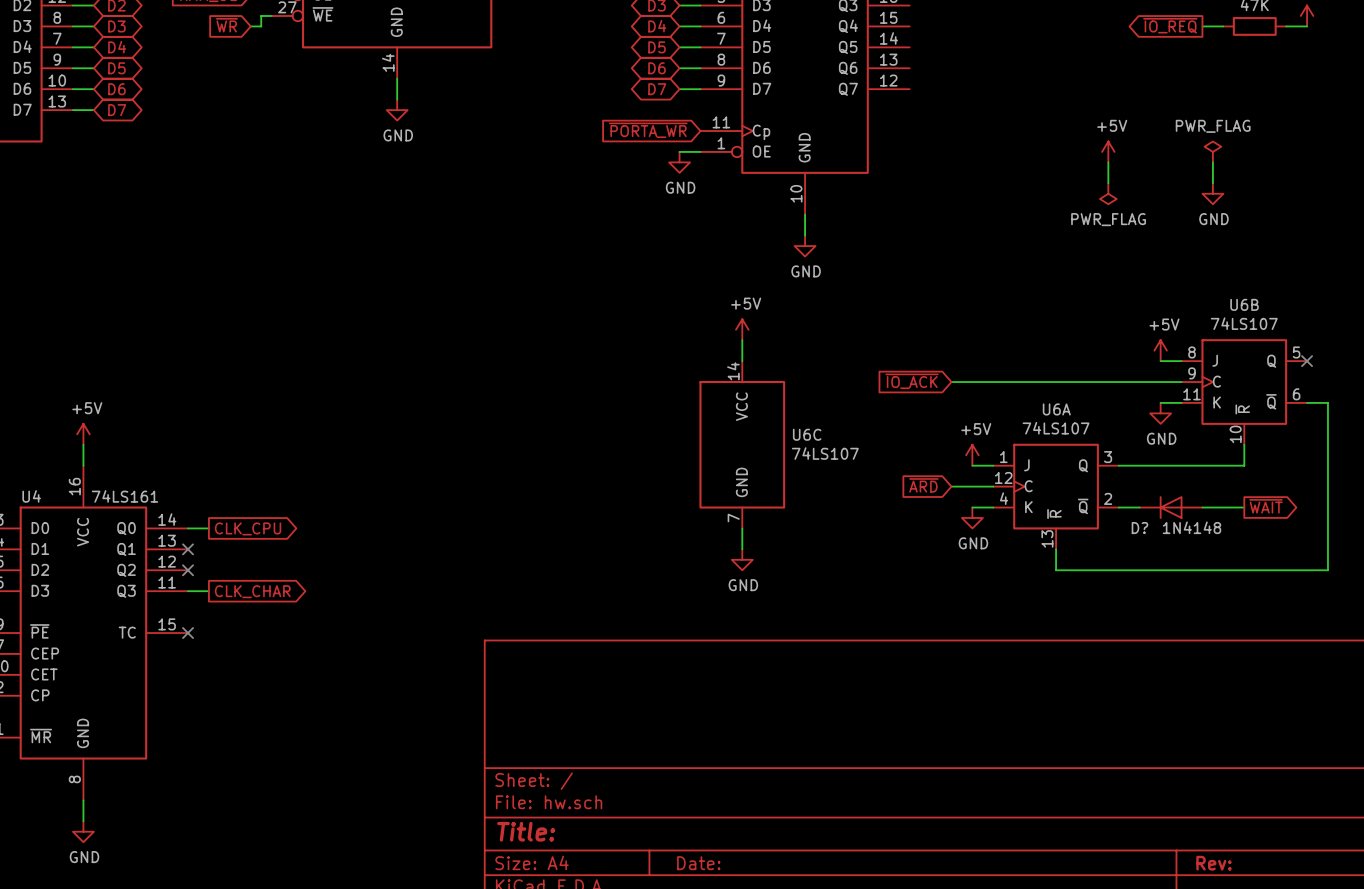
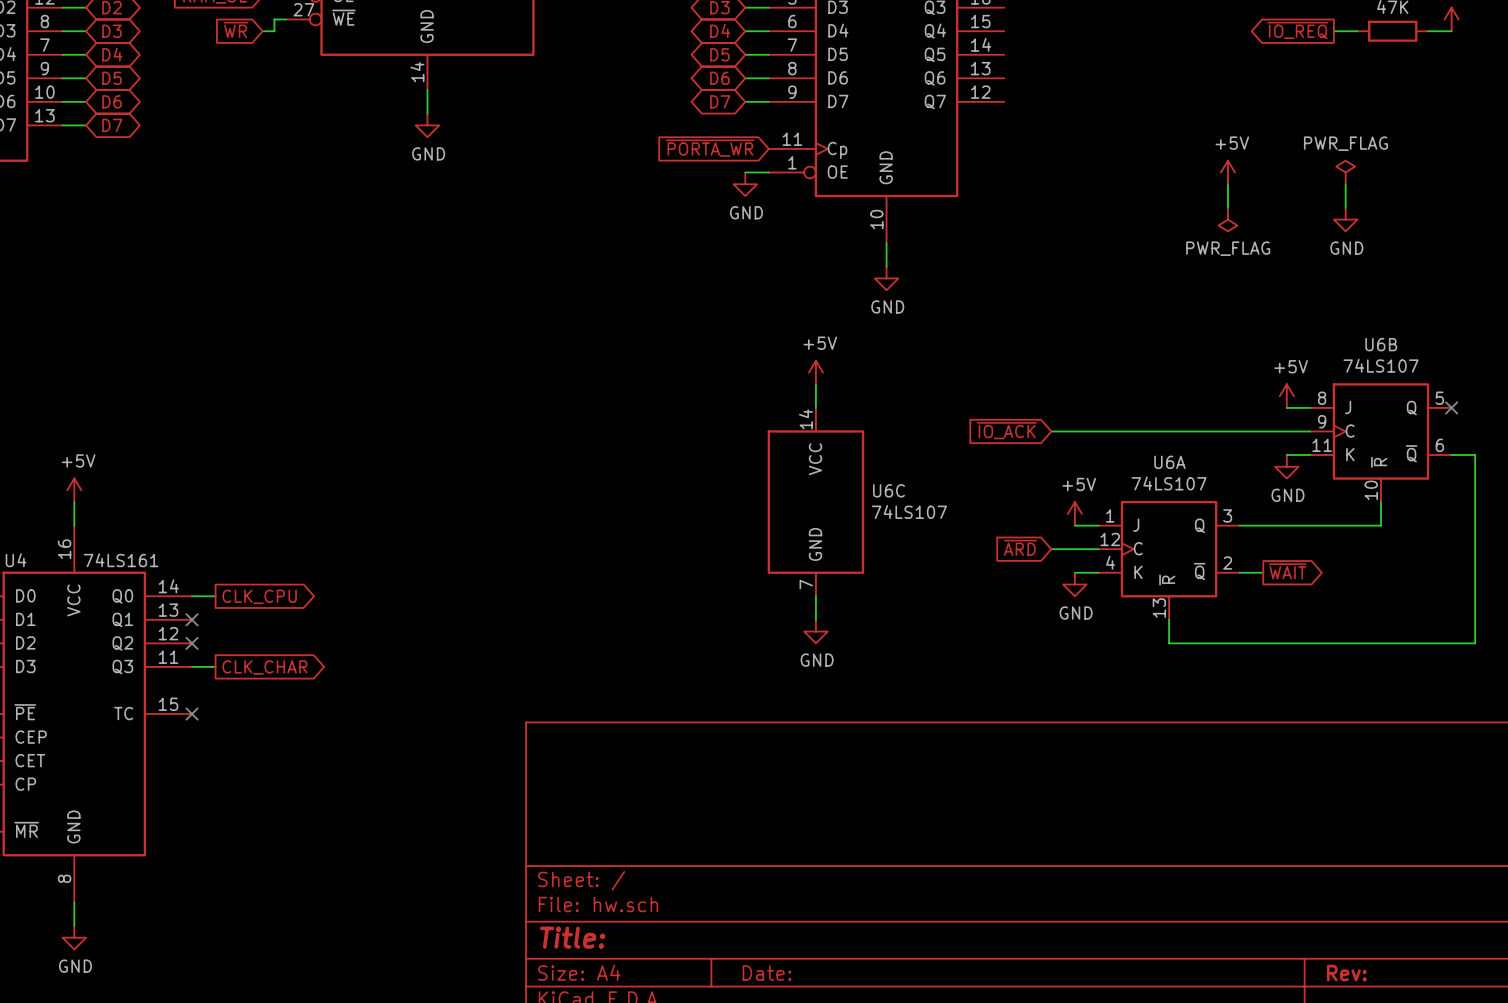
global label position: ~{WAIT} (1266, 506) -> ~{WAIT} (1287, 571)
D?: 1N4148 (1171, 507) -> none
wire: (1202, 507) (1244, 507) -> none

